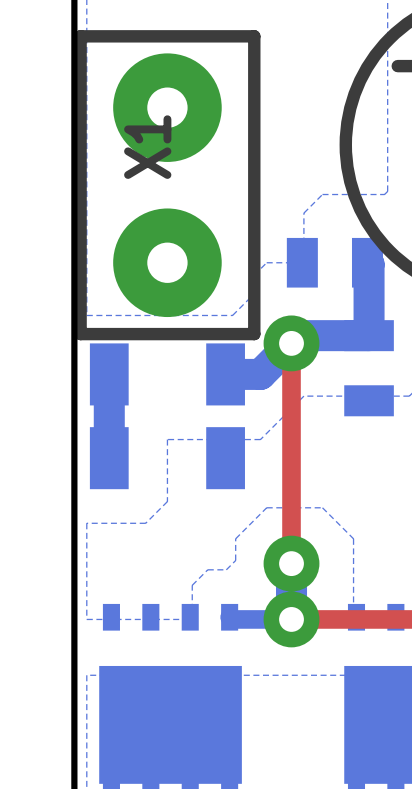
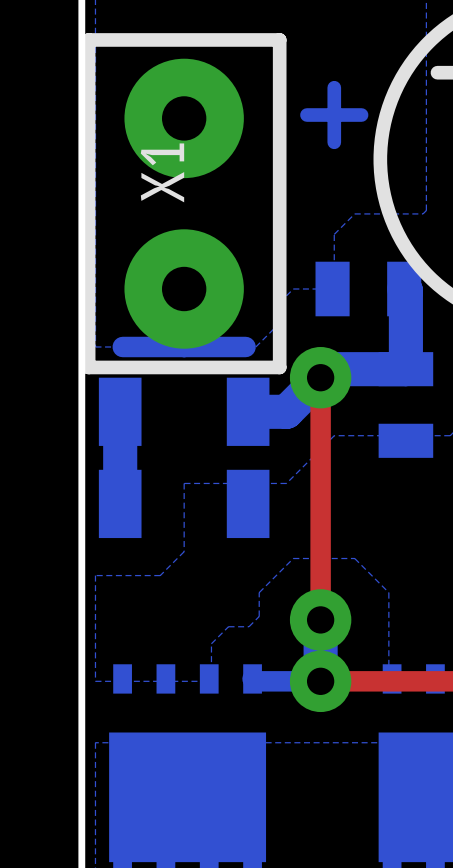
bottom track: none -> (334, 87) (334, 142)
bottom track: none -> (306, 115) (361, 115)
bottom track: none -> (122, 346) (245, 346)

